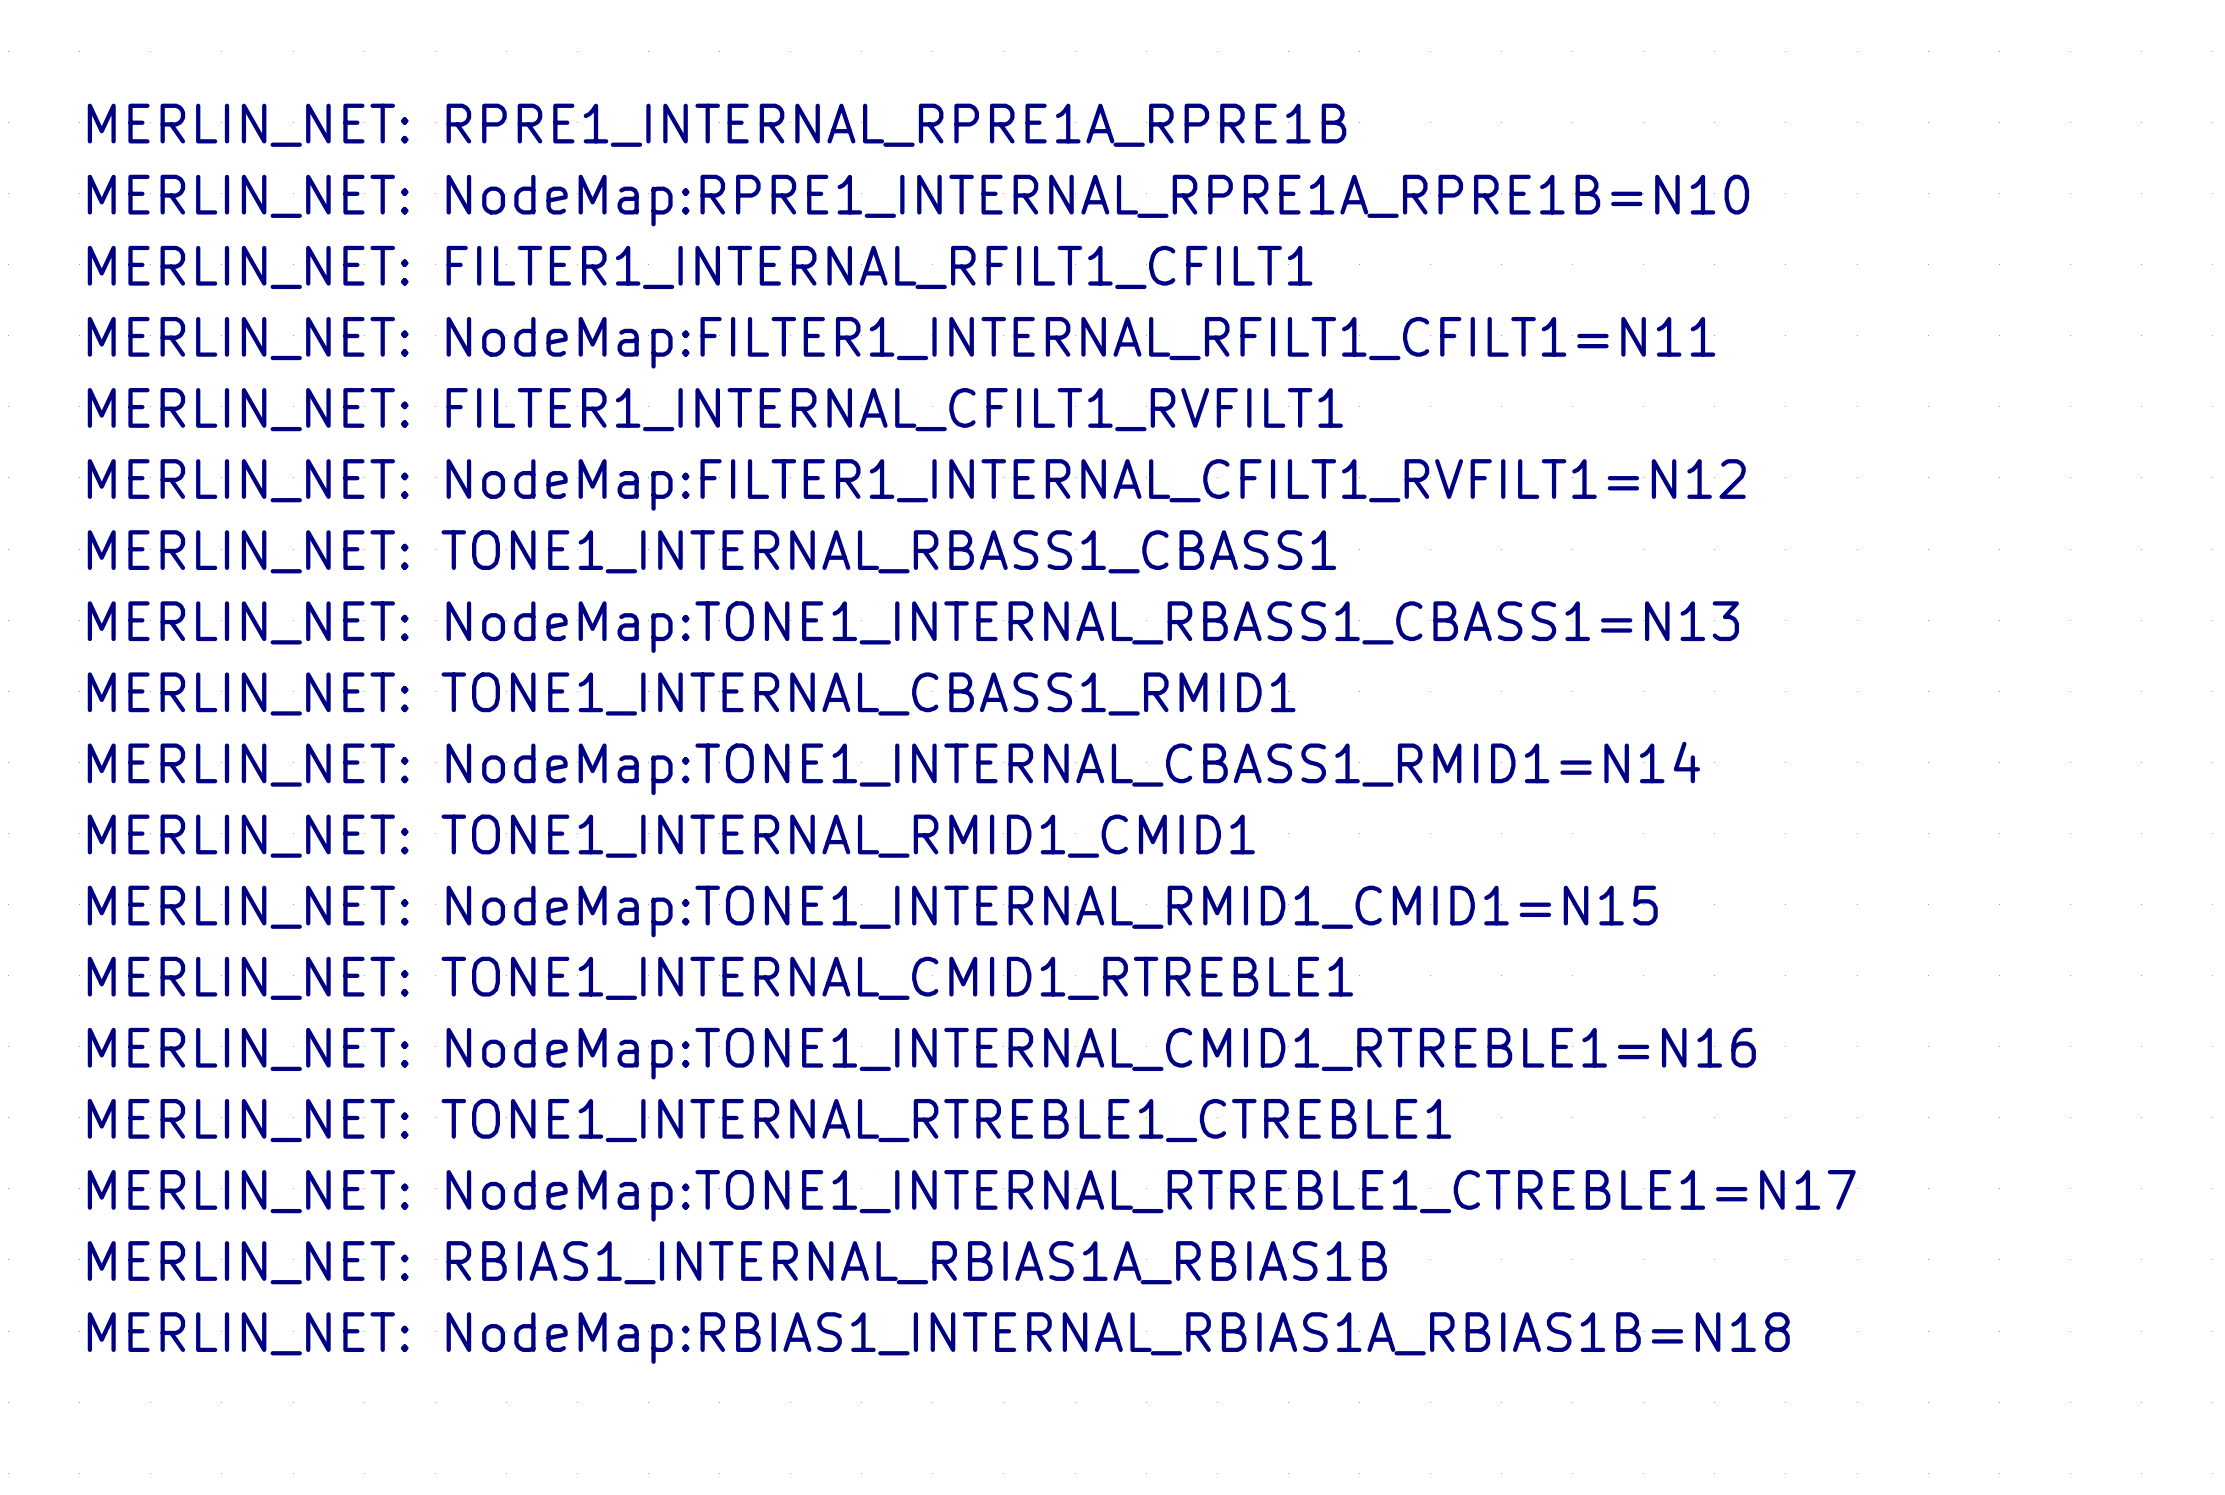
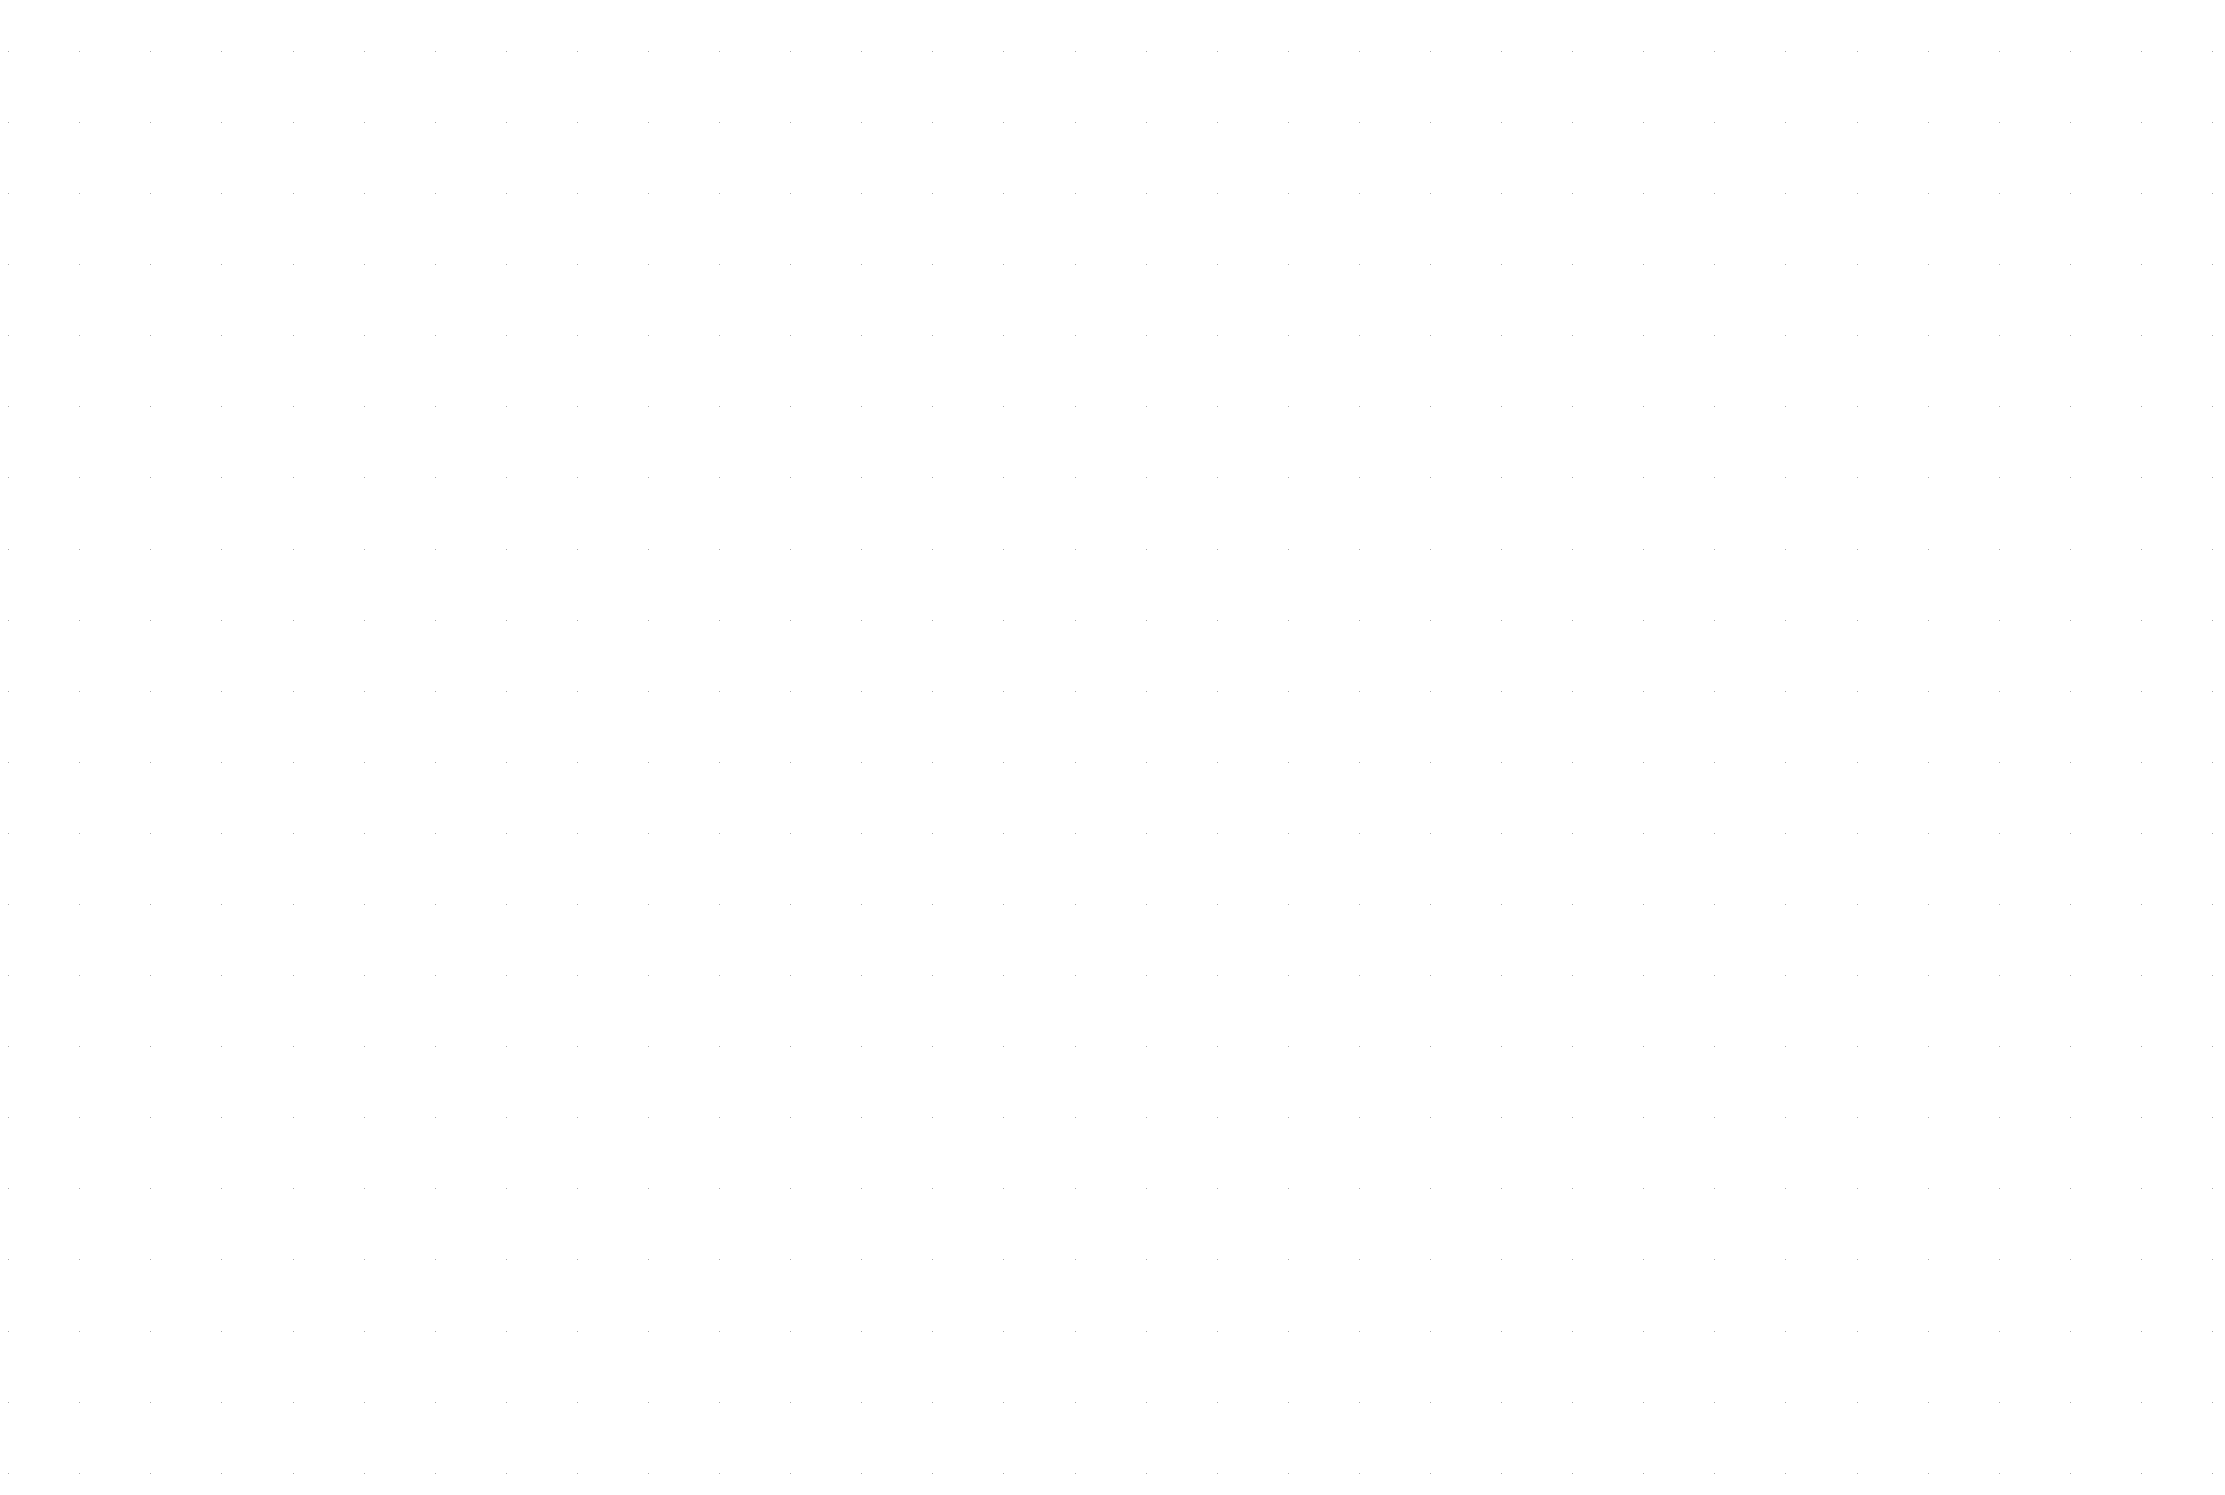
text: MERLIN_NET: RPRE1_INTERNAL_RPRE1A_RPRE1B (717, 125) -> none
text: MERLIN_NET: NodeMap:RPRE1_INTERNAL_RPRE1A_RPRE1B=N10 (918, 200) -> none
text: MERLIN_NET: FILTER1_INTERNAL_RFILT1_CFILT1 (700, 267) -> none
text: MERLIN_NET: NodeMap:FILTER1_INTERNAL_RFILT1_CFILT1=N11 (901, 342) -> none
text: MERLIN_NET: FILTER1_INTERNAL_CFILT1_RVFILT1 (715, 409) -> none
text: MERLIN_NET: NodeMap:FILTER1_INTERNAL_CFILT1_RVFILT1=N12 (916, 484) -> none
text: MERLIN_NET: TONE1_INTERNAL_RBASS1_CBASS1 (711, 551) -> none
text: MERLIN_NET: NodeMap:TONE1_INTERNAL_RBASS1_CBASS1=N13 (913, 627) -> none
text: MERLIN_NET: TONE1_INTERNAL_CBASS1_RMID1 (691, 693) -> none
text: MERLIN_NET: NodeMap:TONE1_INTERNAL_CBASS1_RMID1=N14 (893, 768) -> none
text: MERLIN_NET: TONE1_INTERNAL_RMID1_CMID1 (671, 836) -> none
text: MERLIN_NET: NodeMap:TONE1_INTERNAL_RMID1_CMID1=N15 (872, 911) -> none
text: MERLIN_NET: TONE1_INTERNAL_CMID1_RTREBLE1 (720, 978) -> none
text: MERLIN_NET: NodeMap:TONE1_INTERNAL_CMID1_RTREBLE1=N16 (921, 1053) -> none
text: MERLIN_NET: TONE1_INTERNAL_RTREBLE1_CTREBLE1 (769, 1120) -> none
text: MERLIN_NET: NodeMap:TONE1_INTERNAL_RTREBLE1_CTREBLE1=N17 (971, 1195) -> none
text: MERLIN_NET: RBIAS1_INTERNAL_RBIAS1A_RBIAS1B (737, 1262) -> none
text: MERLIN_NET: NodeMap:RBIAS1_INTERNAL_RBIAS1A_RBIAS1B=N18 (938, 1338) -> none

